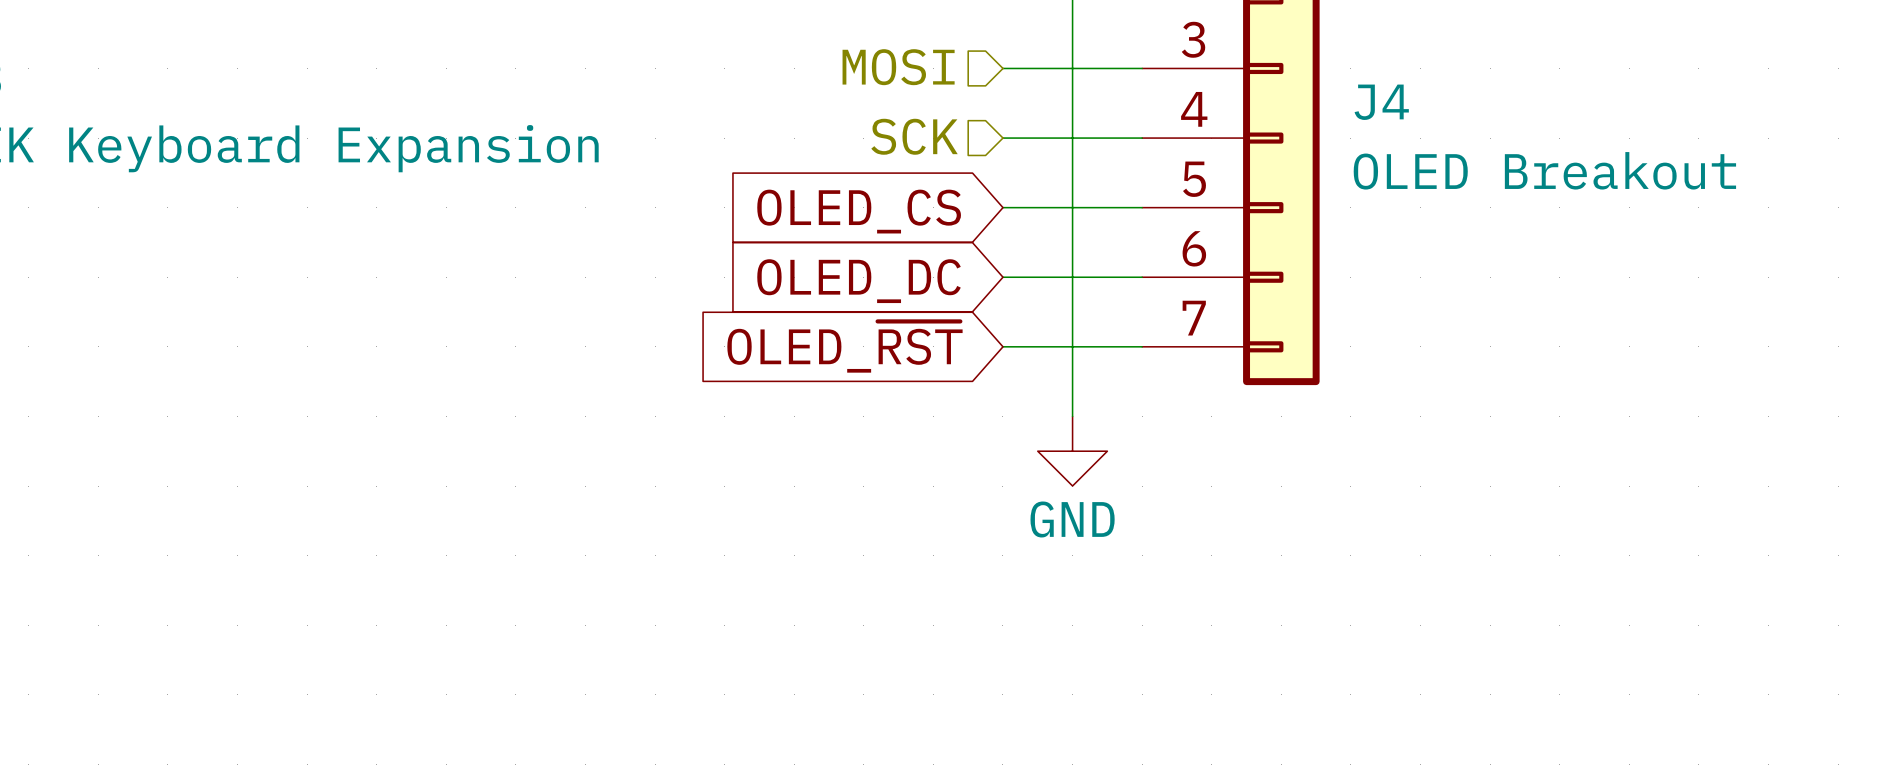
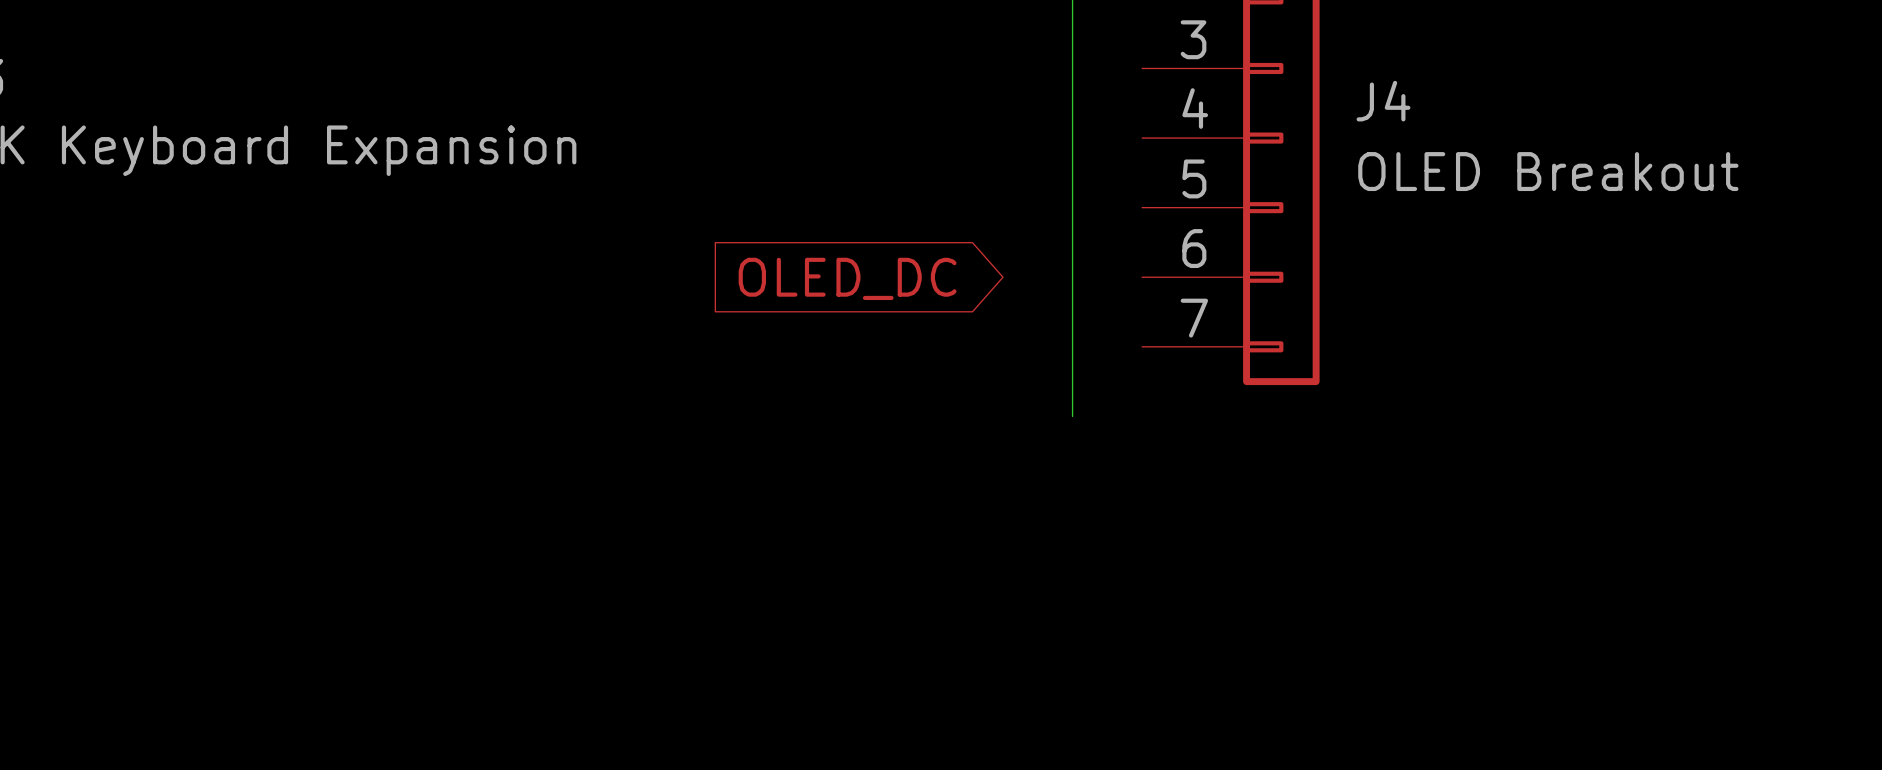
hierarchical label: MOSI (898, 67) -> none
wire: (1002, 68) (1142, 68) -> none
hierarchical label: SCK (914, 136) -> none
wire: (1002, 138) (1142, 138) -> none
wire: (1002, 207) (1142, 207) -> none
global label: OLED_CS (859, 211) -> none
wire: (1002, 277) (1142, 277) -> none
wire: (1002, 346) (1142, 346) -> none
global label: OLED_~{RST} (844, 347) -> none
power symbol: GND (1072, 451) -> none

